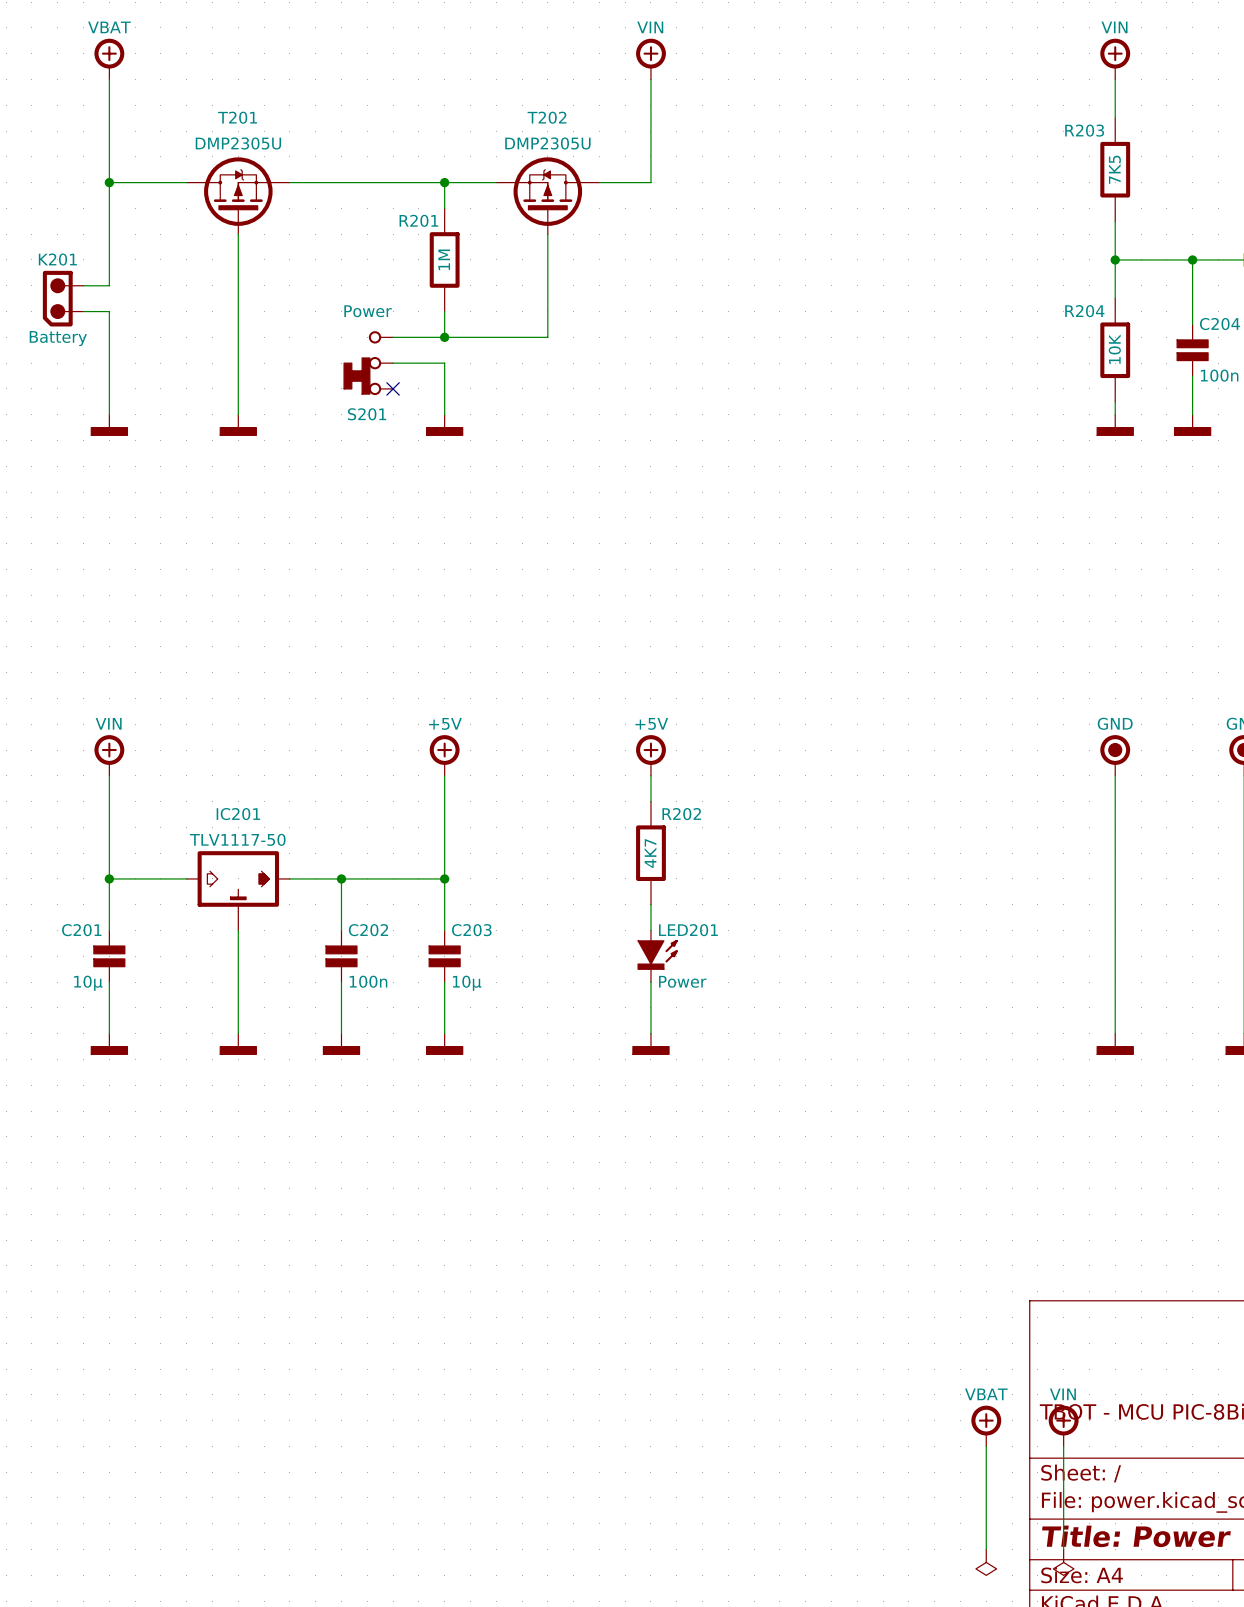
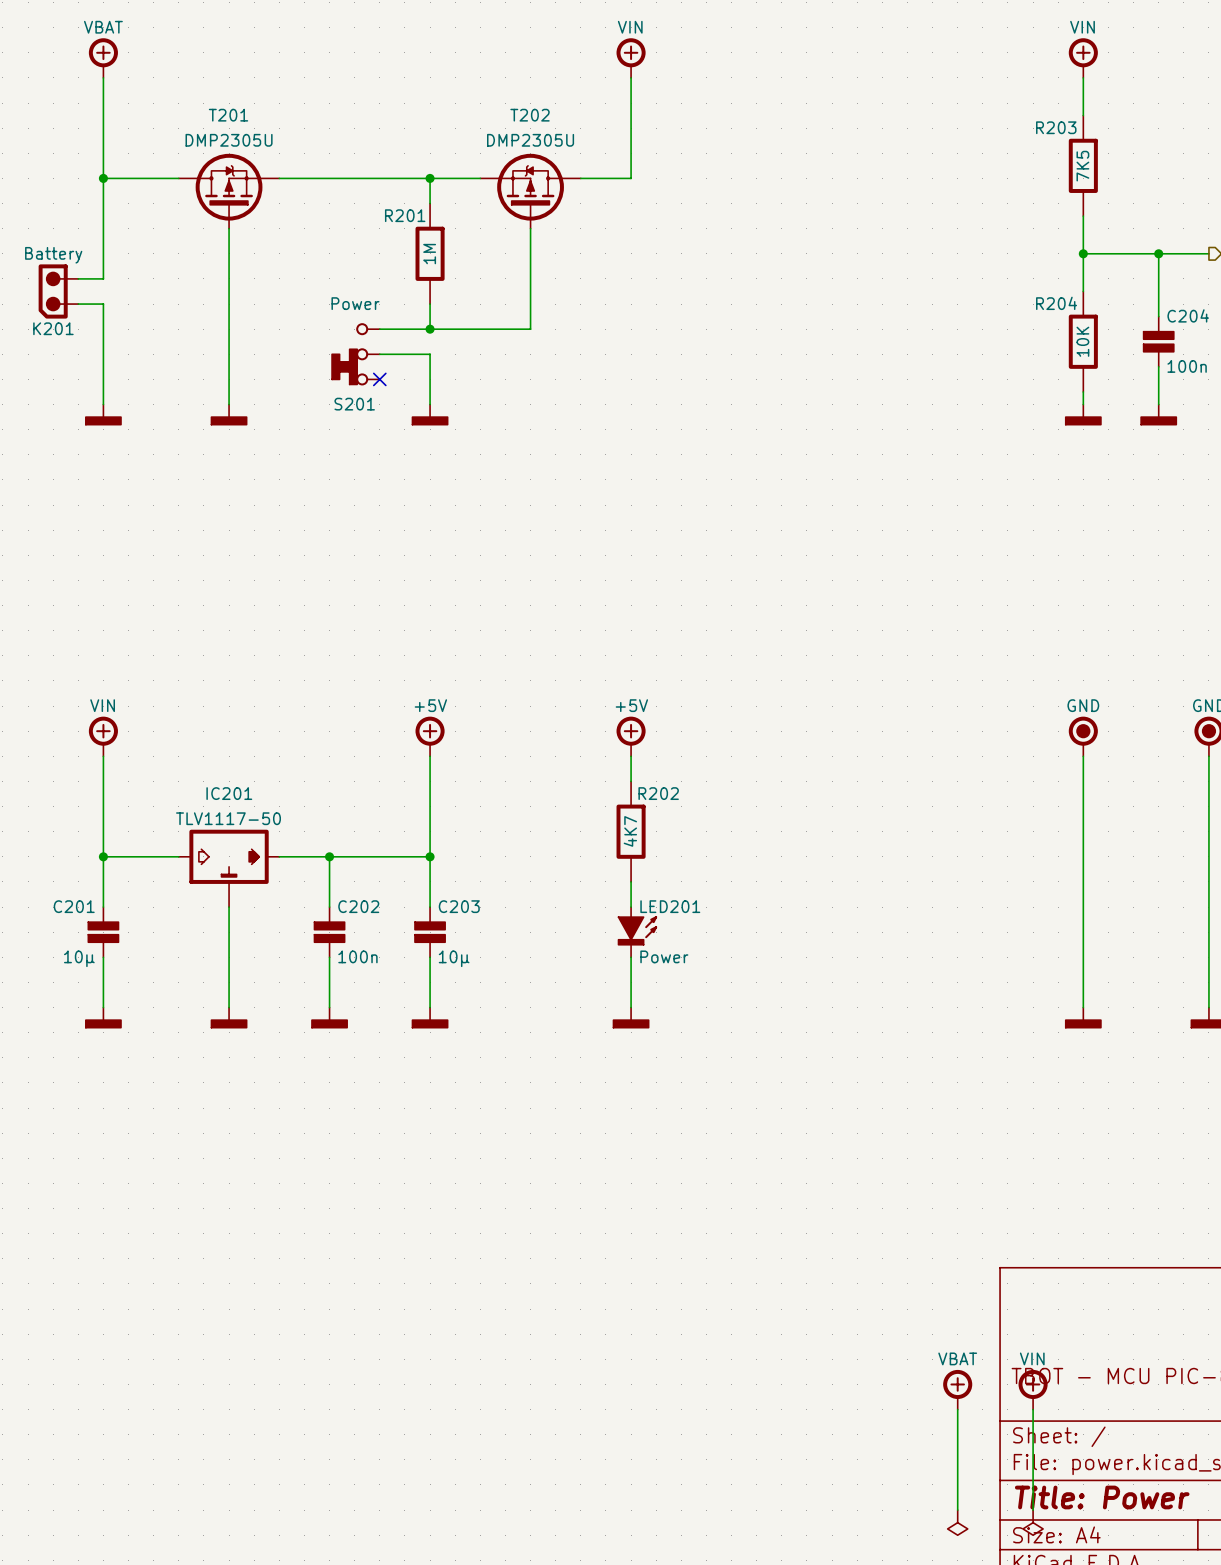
K201 name position: K201 (57, 259) -> K201 (53, 328)
K201 value position: Battery (58, 338) -> Battery (53, 255)

